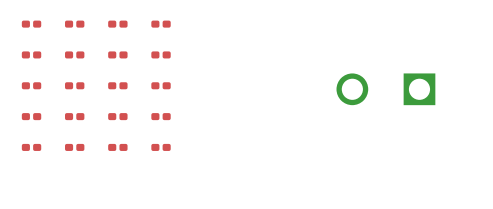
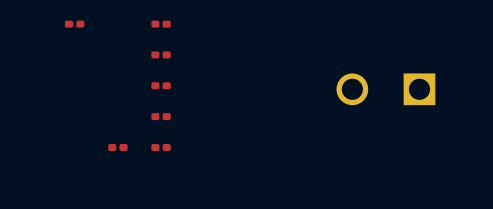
part: (31, 24) -> none
part: (117, 24) -> none
part: (31, 54) -> none
part: (74, 54) -> none
part: (117, 54) -> none
part: (31, 85) -> none
part: (74, 85) -> none
part: (117, 85) -> none
part: (31, 116) -> none
part: (74, 116) -> none
part: (117, 116) -> none
part: (31, 147) -> none
part: (74, 147) -> none

